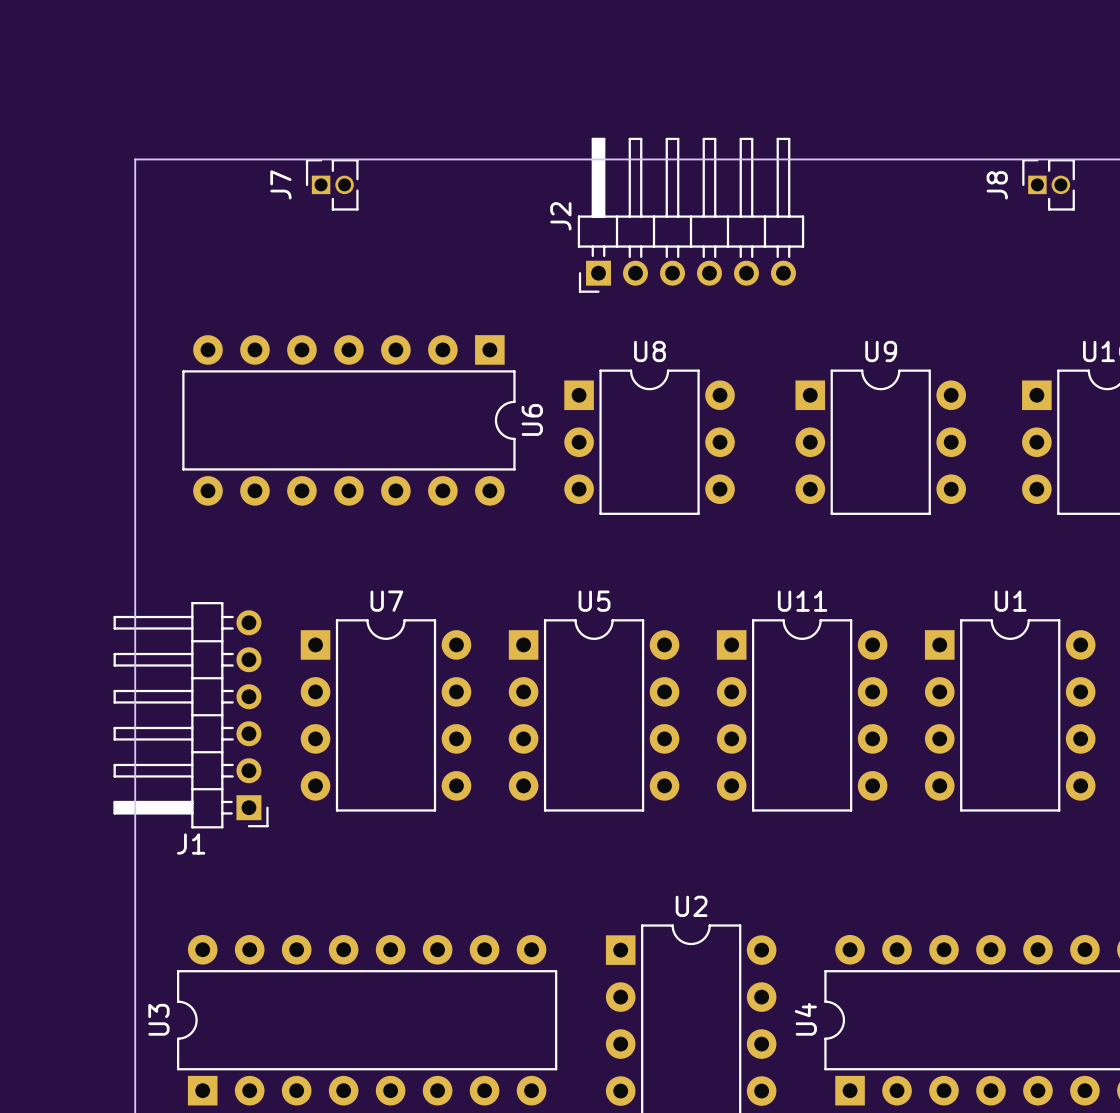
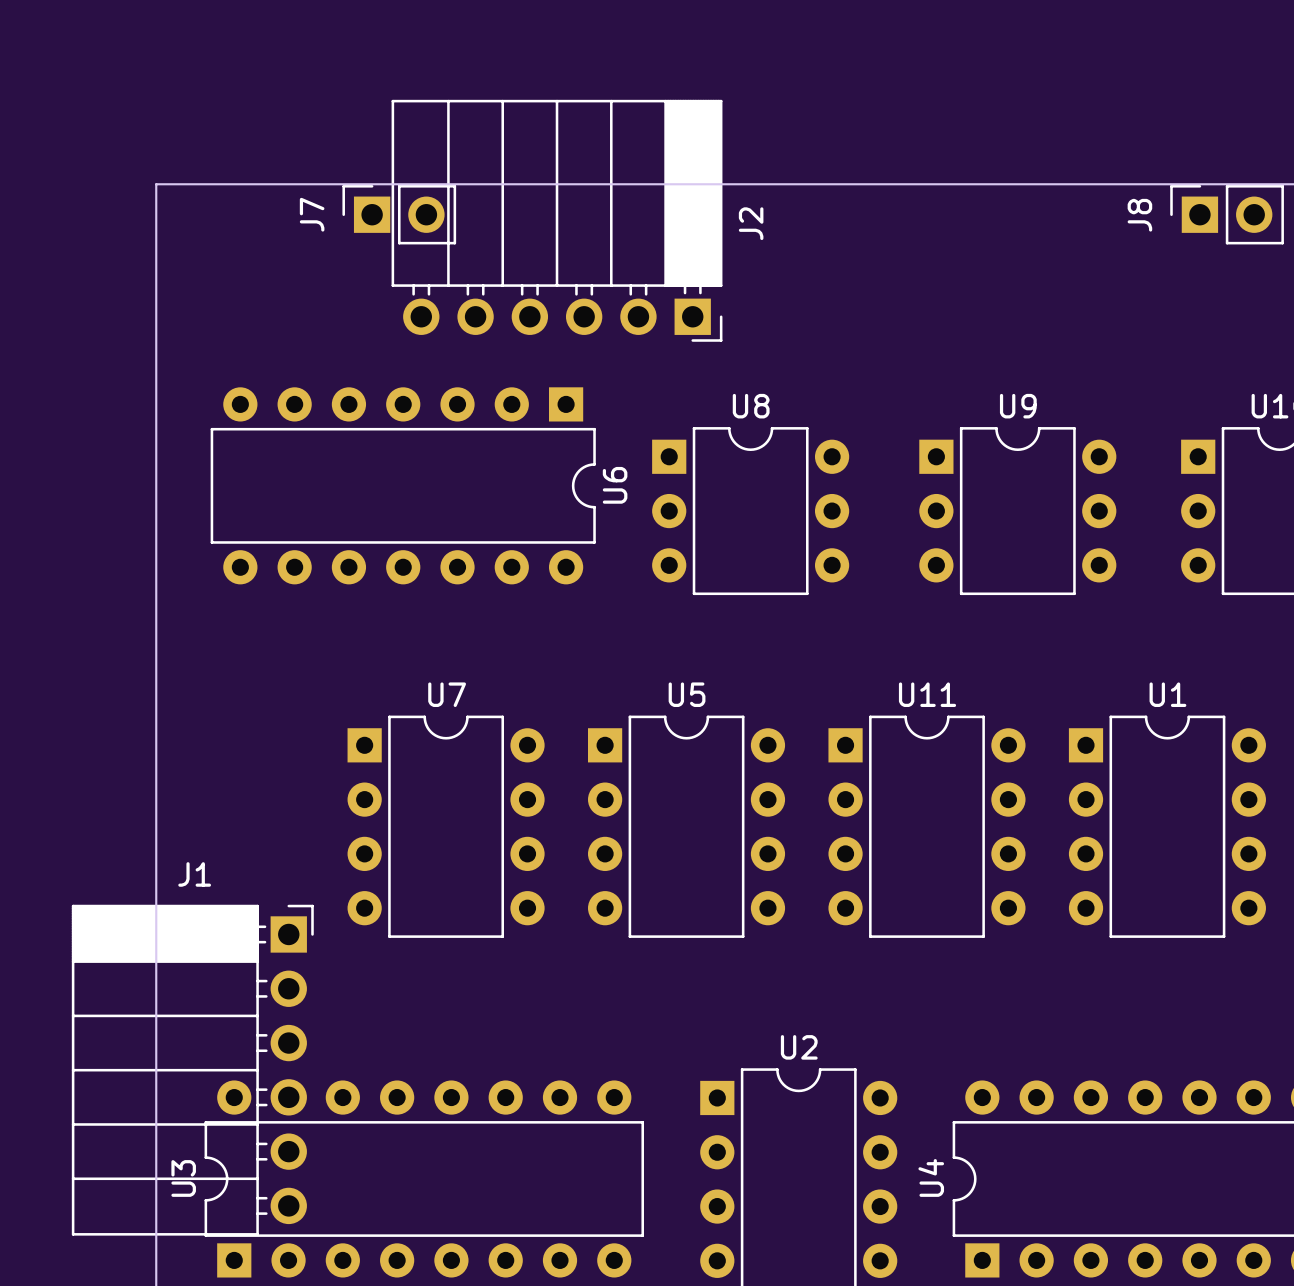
J2 footprint: [577, 137, 805, 293] -> [391, 99, 723, 342]
J7 footprint: [305, 159, 359, 211] -> [342, 185, 457, 245]
J8 footprint: [1022, 159, 1075, 211] -> [1170, 185, 1284, 245]
J2 name position: J2 (560, 216) -> J2 (751, 223)
J1 footprint: [113, 602, 269, 829] -> [71, 904, 314, 1236]
J1 name position: J1 (191, 844) -> J1 (194, 874)

